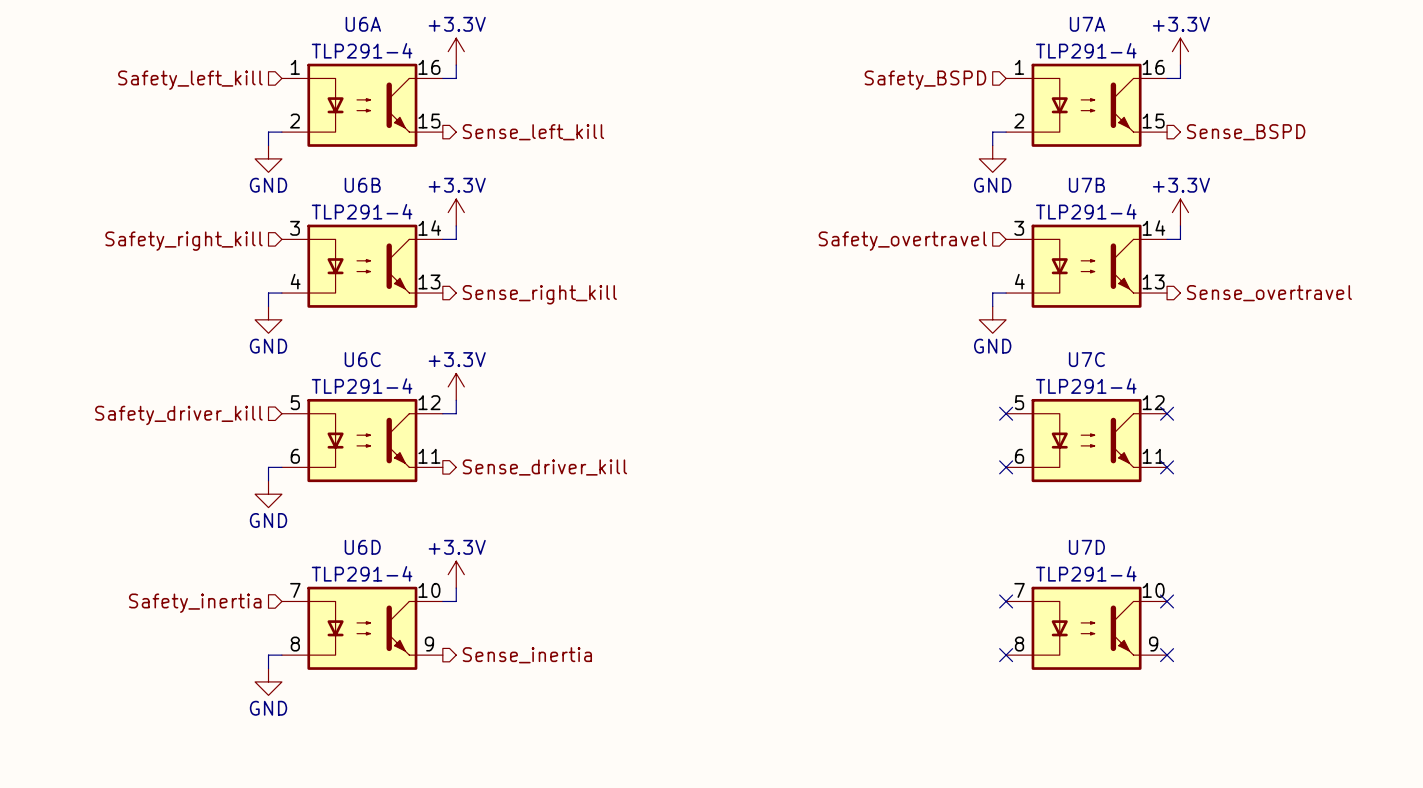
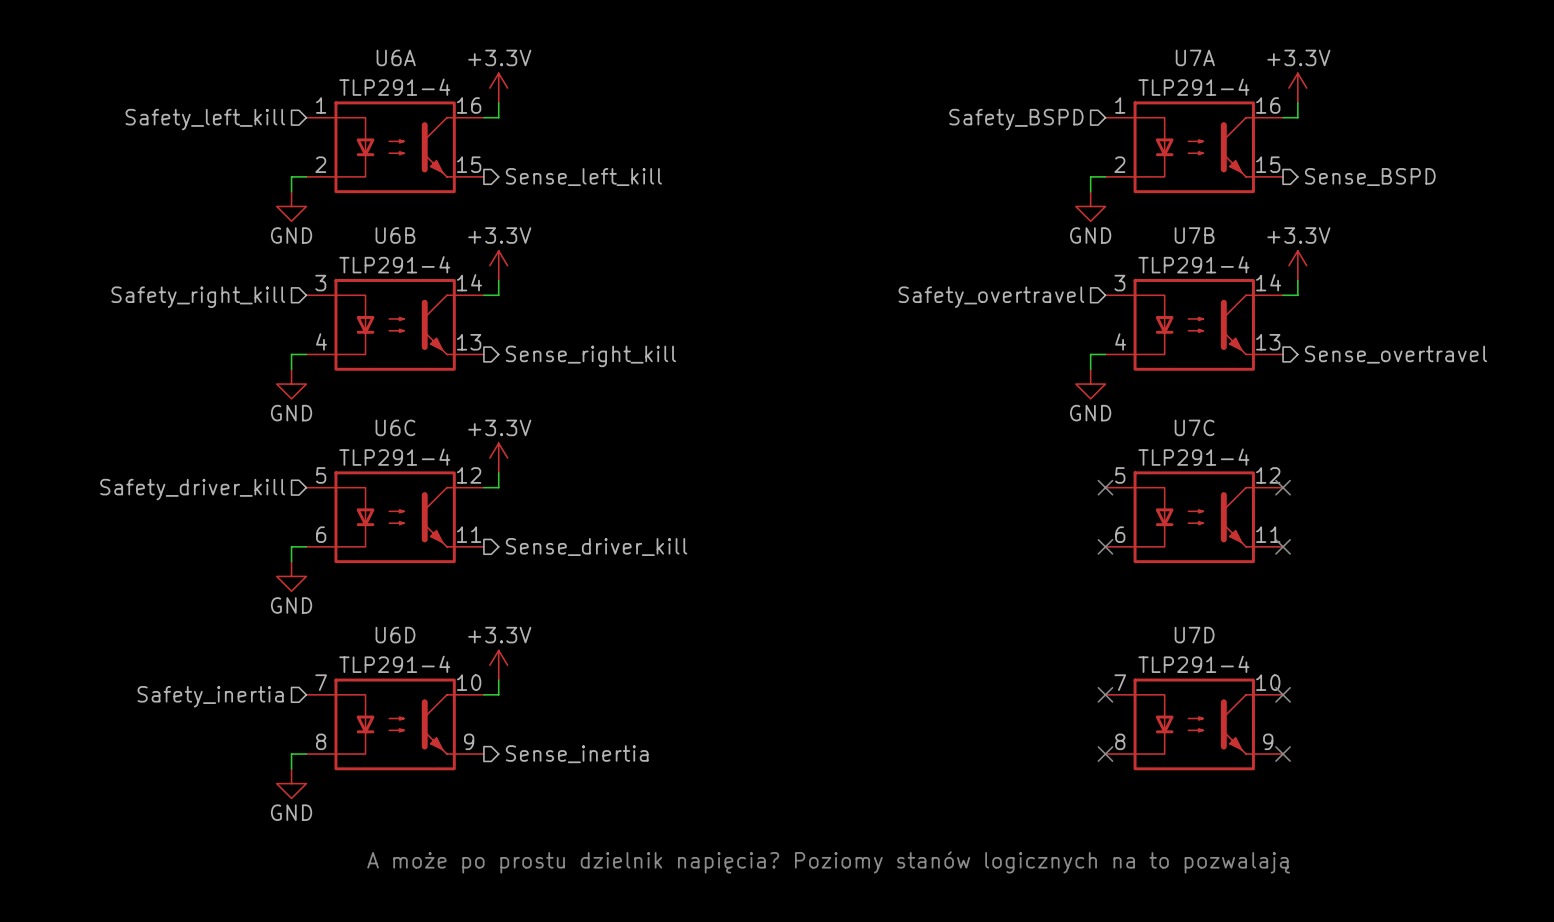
text: none -> A może po prostu dzielnik napięcia? Poziomy stanów logicznych na to pozwalają (828, 862)

